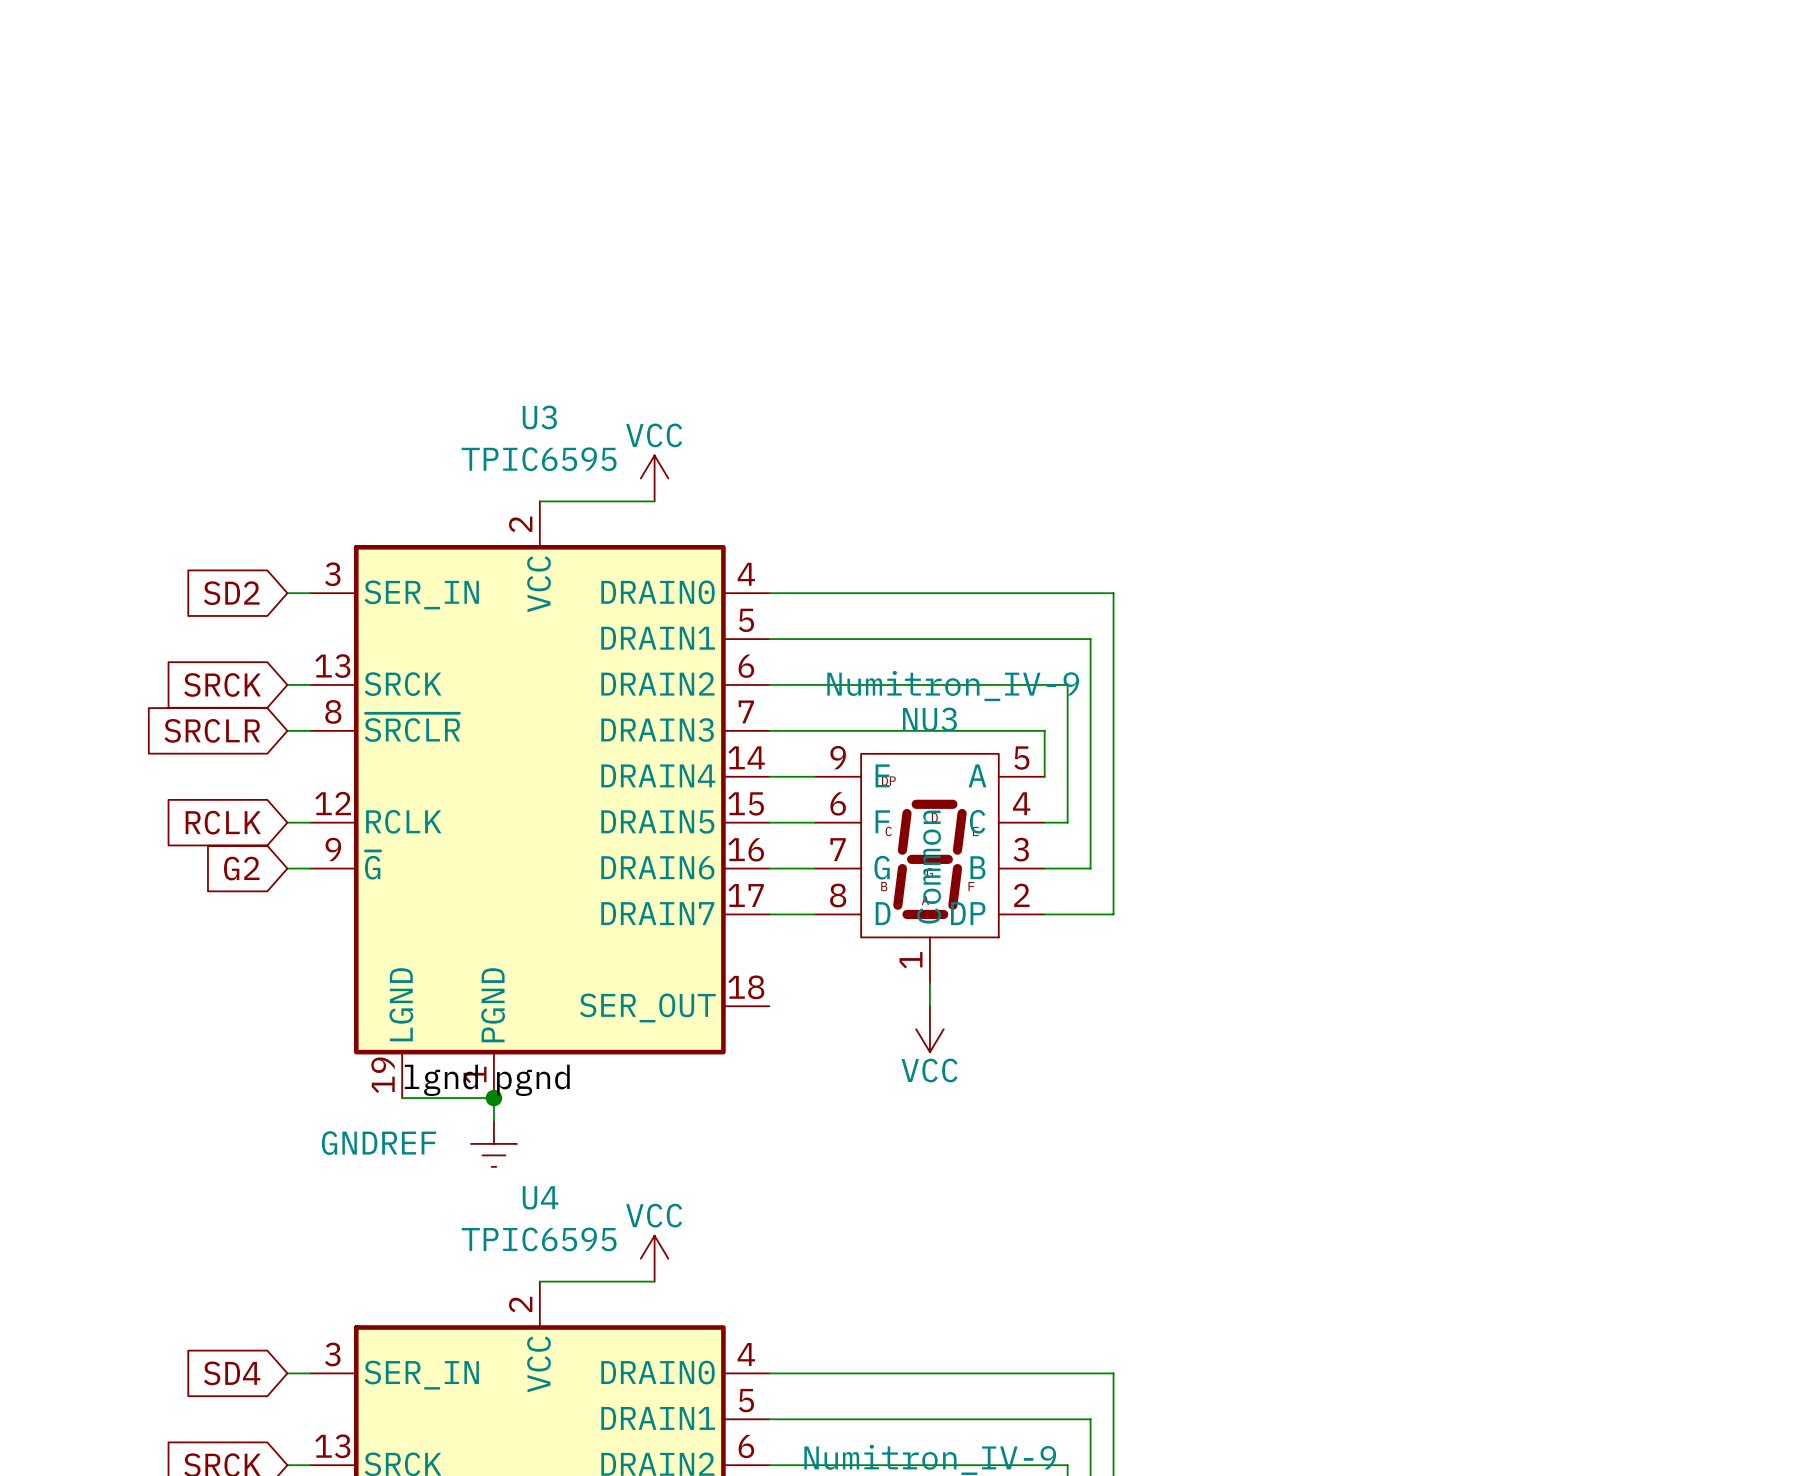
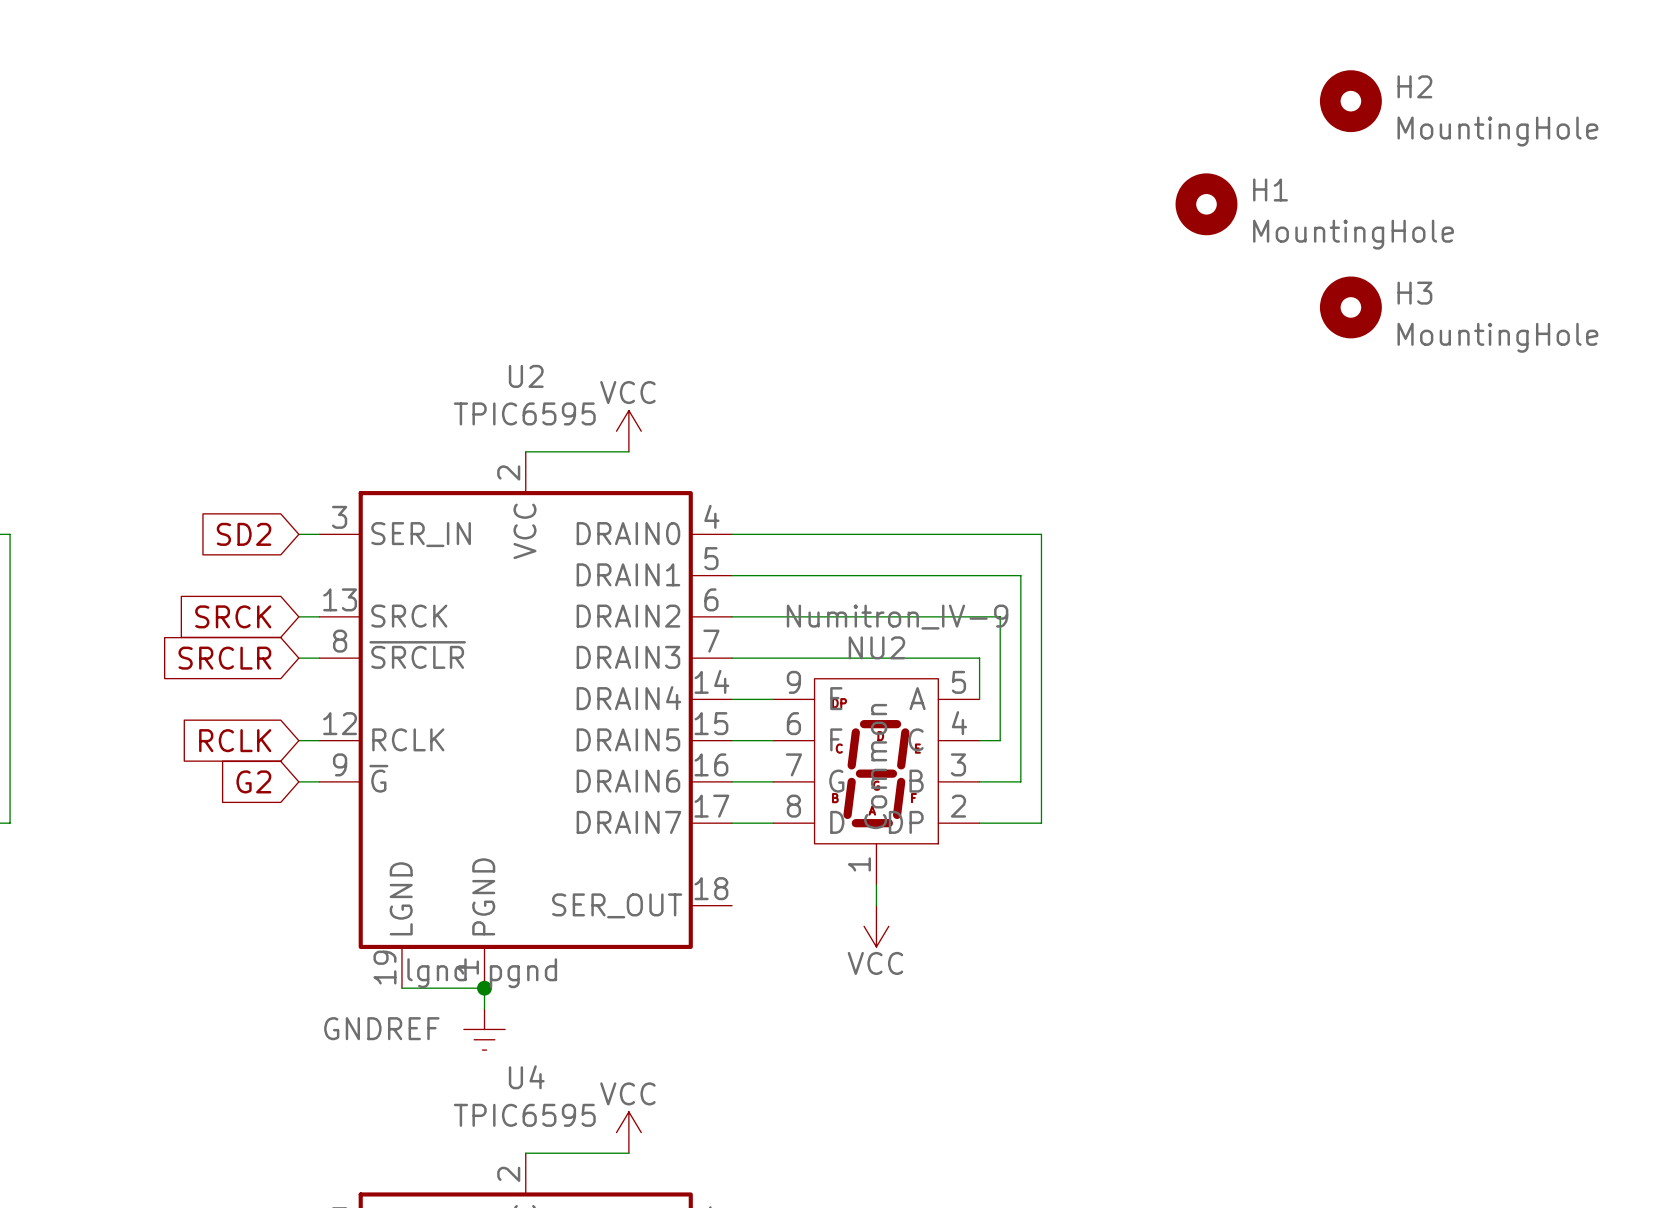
H2: none -> MountingHole (1350, 101)
H1: none -> MountingHole (1206, 204)
H3: none -> MountingHole (1350, 307)
U3 name: U3 (539, 417) -> U2 (526, 376)
NU3 name: NU3 (929, 719) -> NU2 (876, 647)

